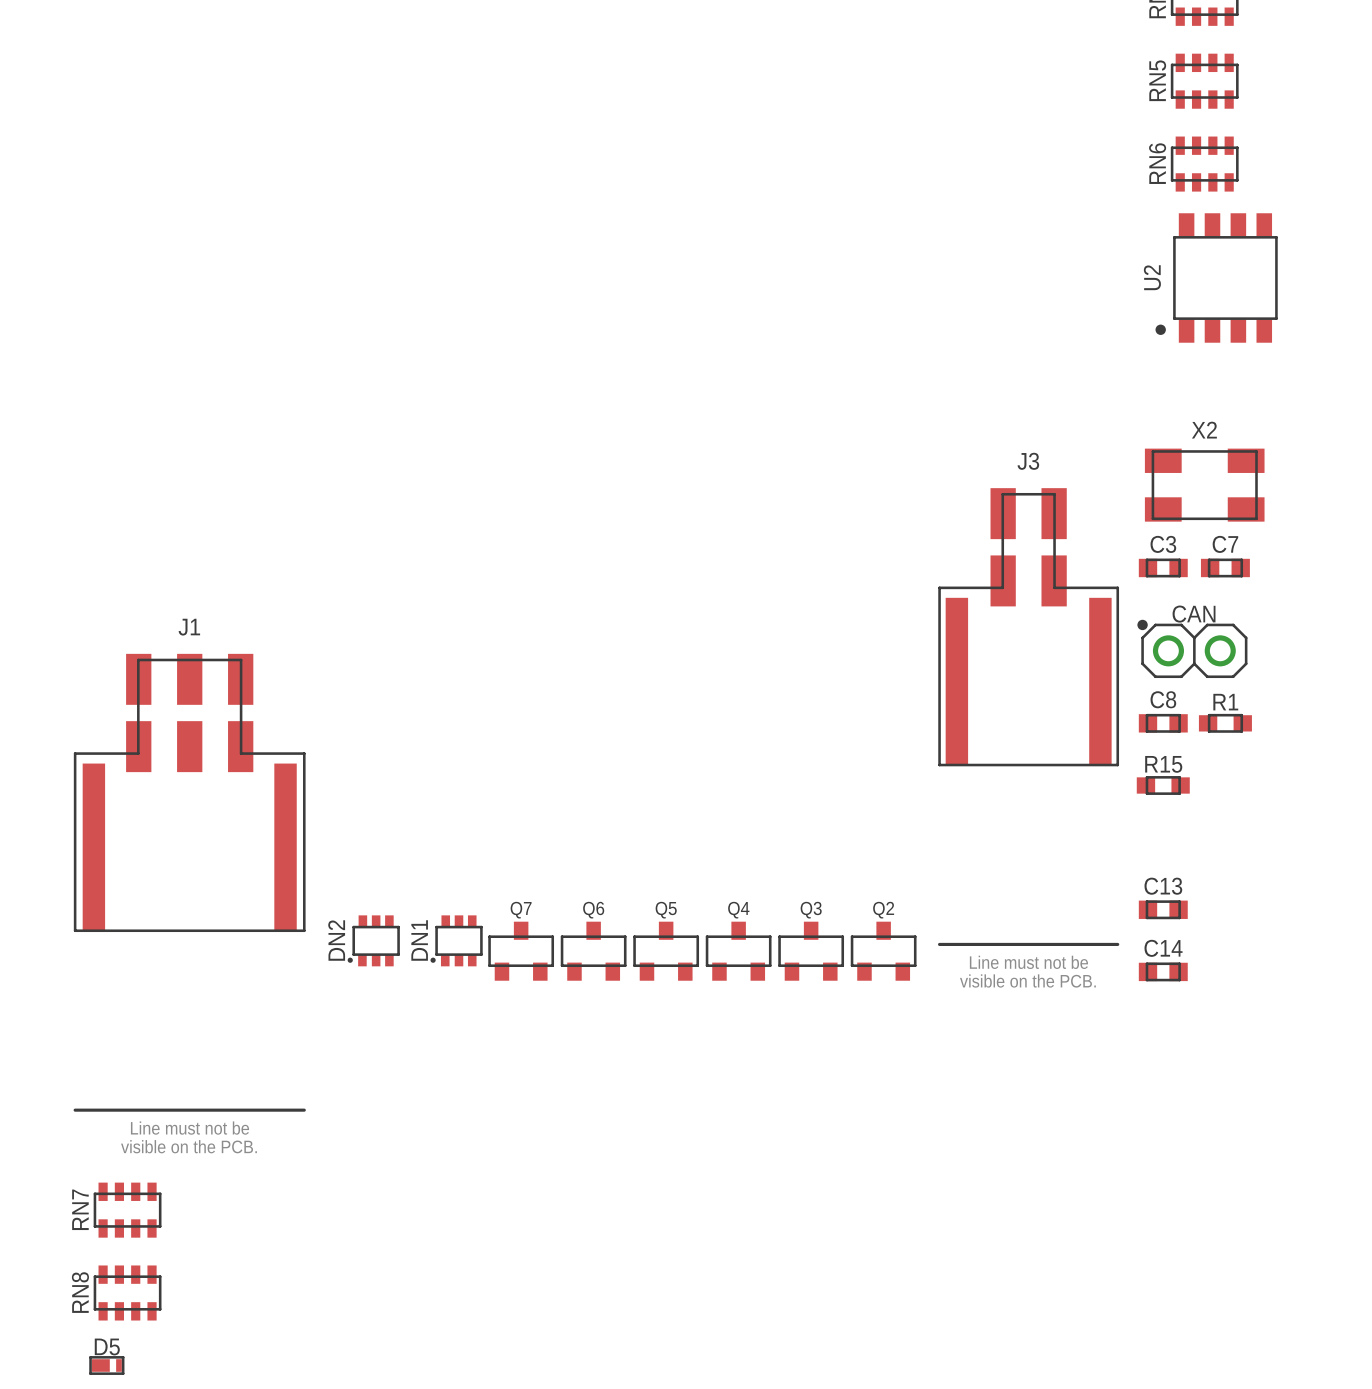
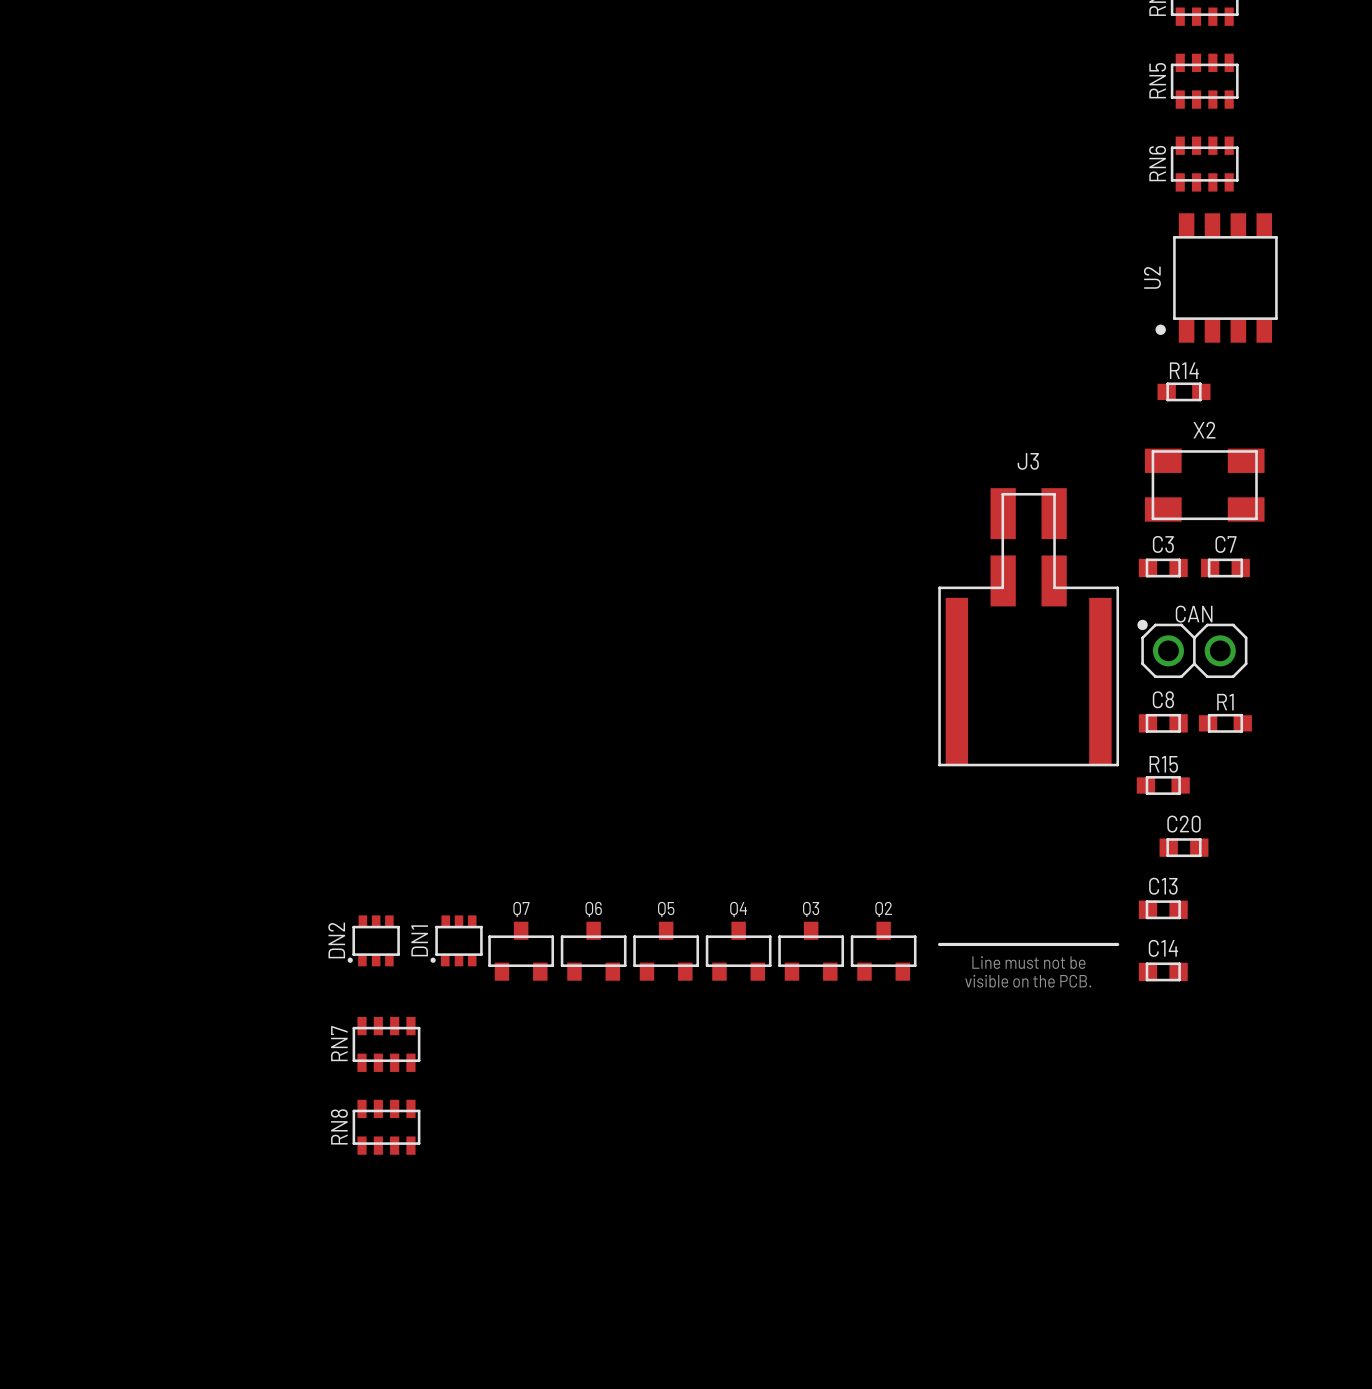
R14: none -> (1184, 391)
C20: none -> (1184, 847)
J1: (189, 882) -> none
RN7 position: (127, 1210) -> (386, 1044)
RN8 position: (127, 1292) -> (386, 1127)
D5: (106, 1365) -> none

